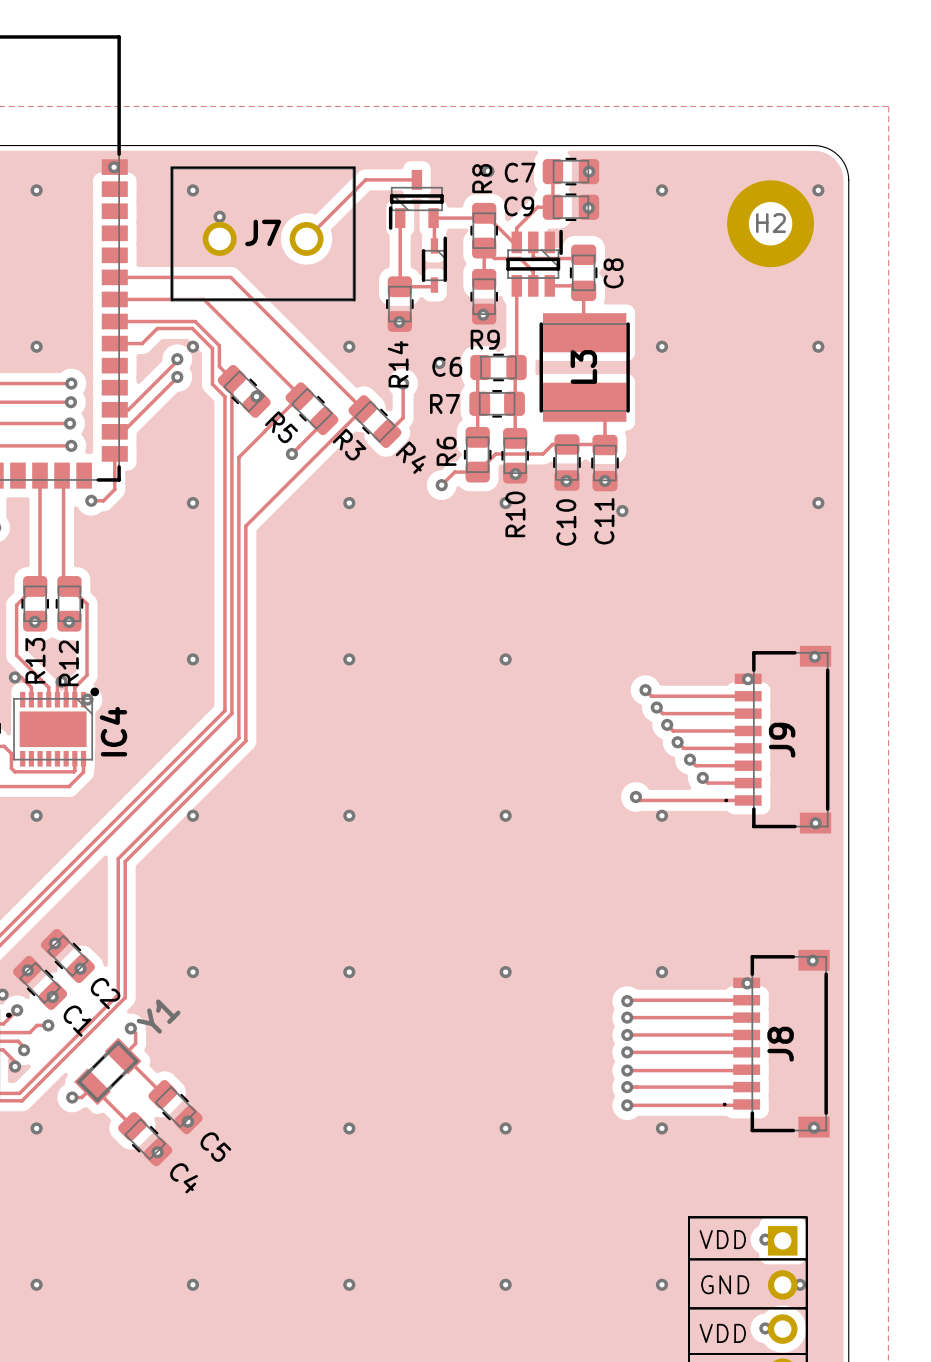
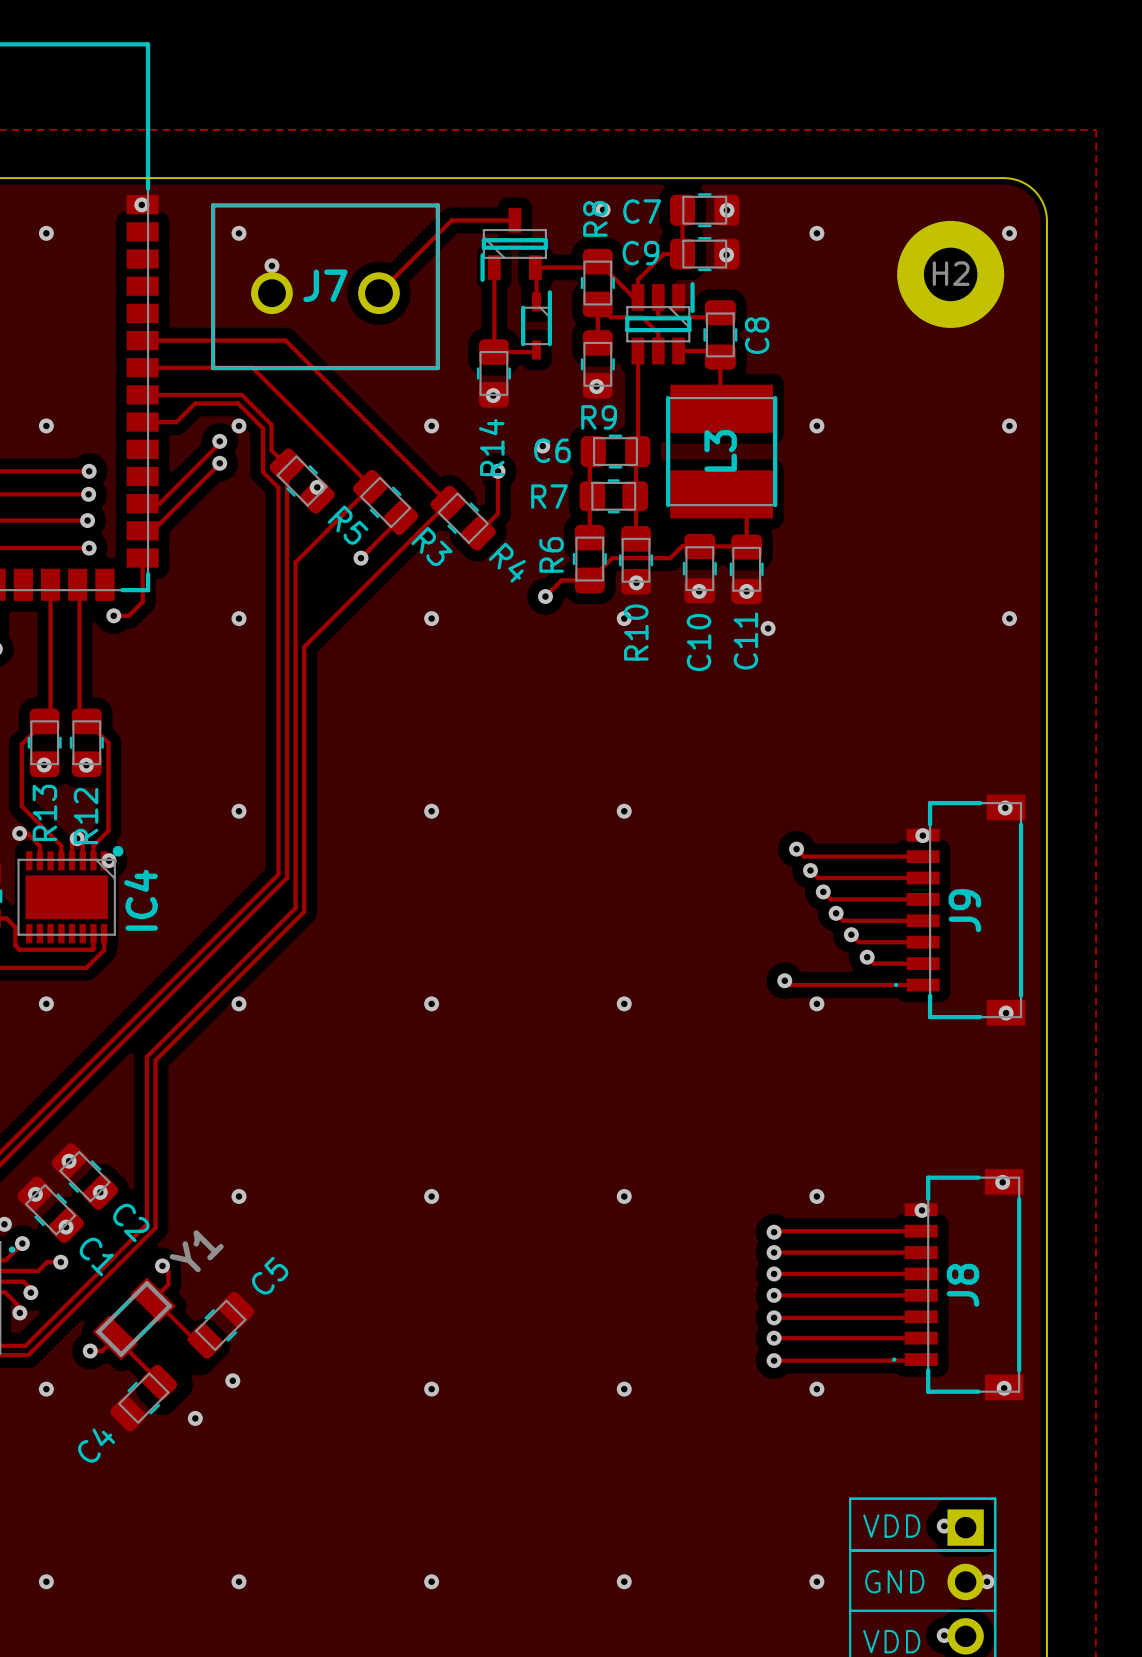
C5 rotation: 0° (175, 1107) -> 90° clockwise (220, 1325)
C4 rotation: 0° (145, 1139) -> 90° clockwise (143, 1398)
C5 name position: C5 (215, 1147) -> C5 (270, 1275)

